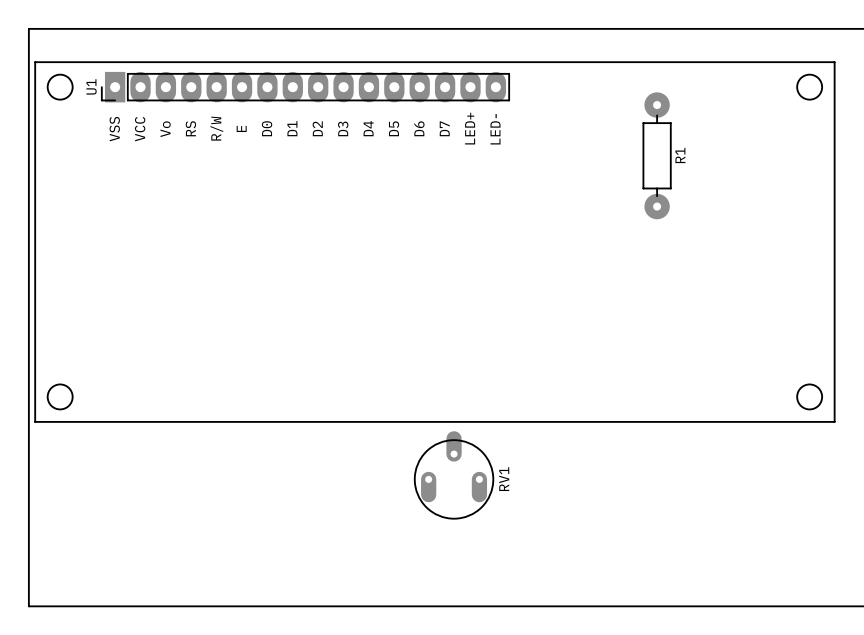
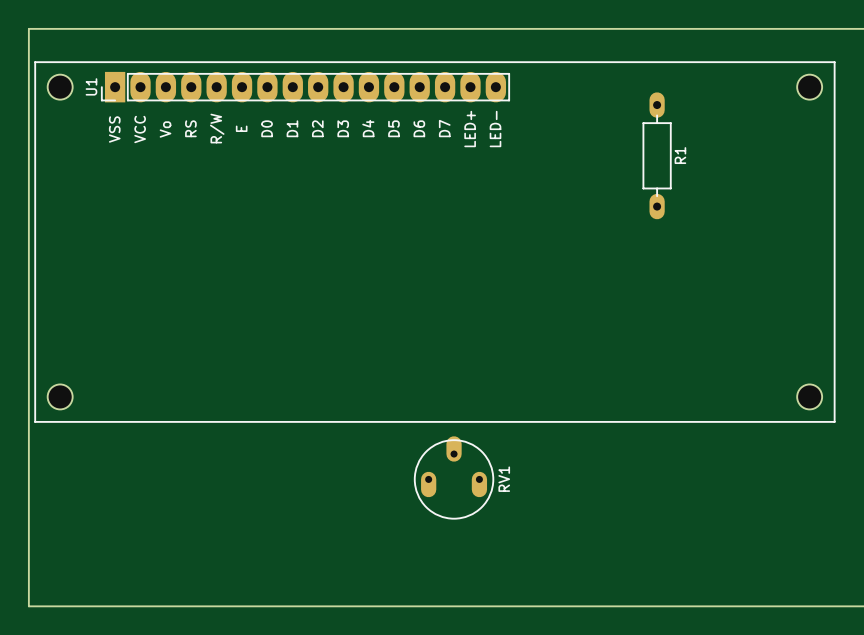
R1 footprint: [642, 92, 672, 220] -> [642, 92, 672, 220]
RV1 footprint: [414, 431, 494, 520] -> [414, 436, 494, 520]

